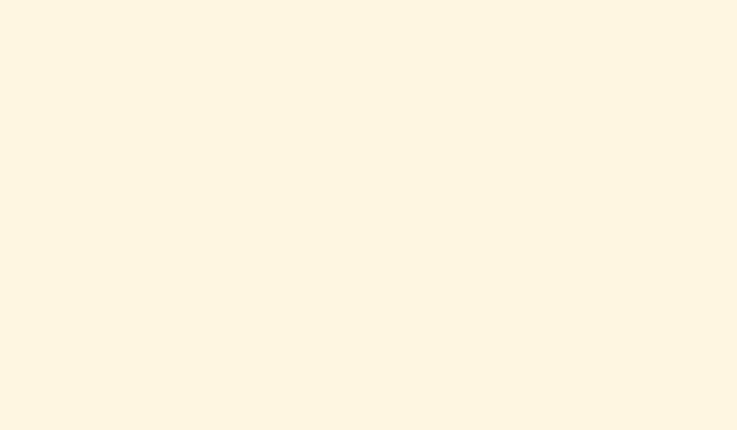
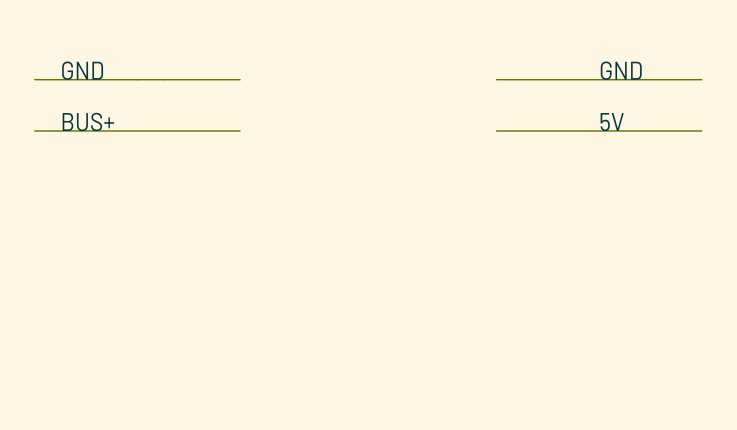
label: none -> GND (82, 70)
label: none -> GND (621, 70)
wire: none -> (34, 79) (240, 79)
wire: none -> (496, 79) (701, 79)
label: none -> BUS+ (88, 121)
label: none -> 5V (612, 122)
wire: none -> (34, 130) (240, 130)
wire: none -> (496, 130) (701, 130)

